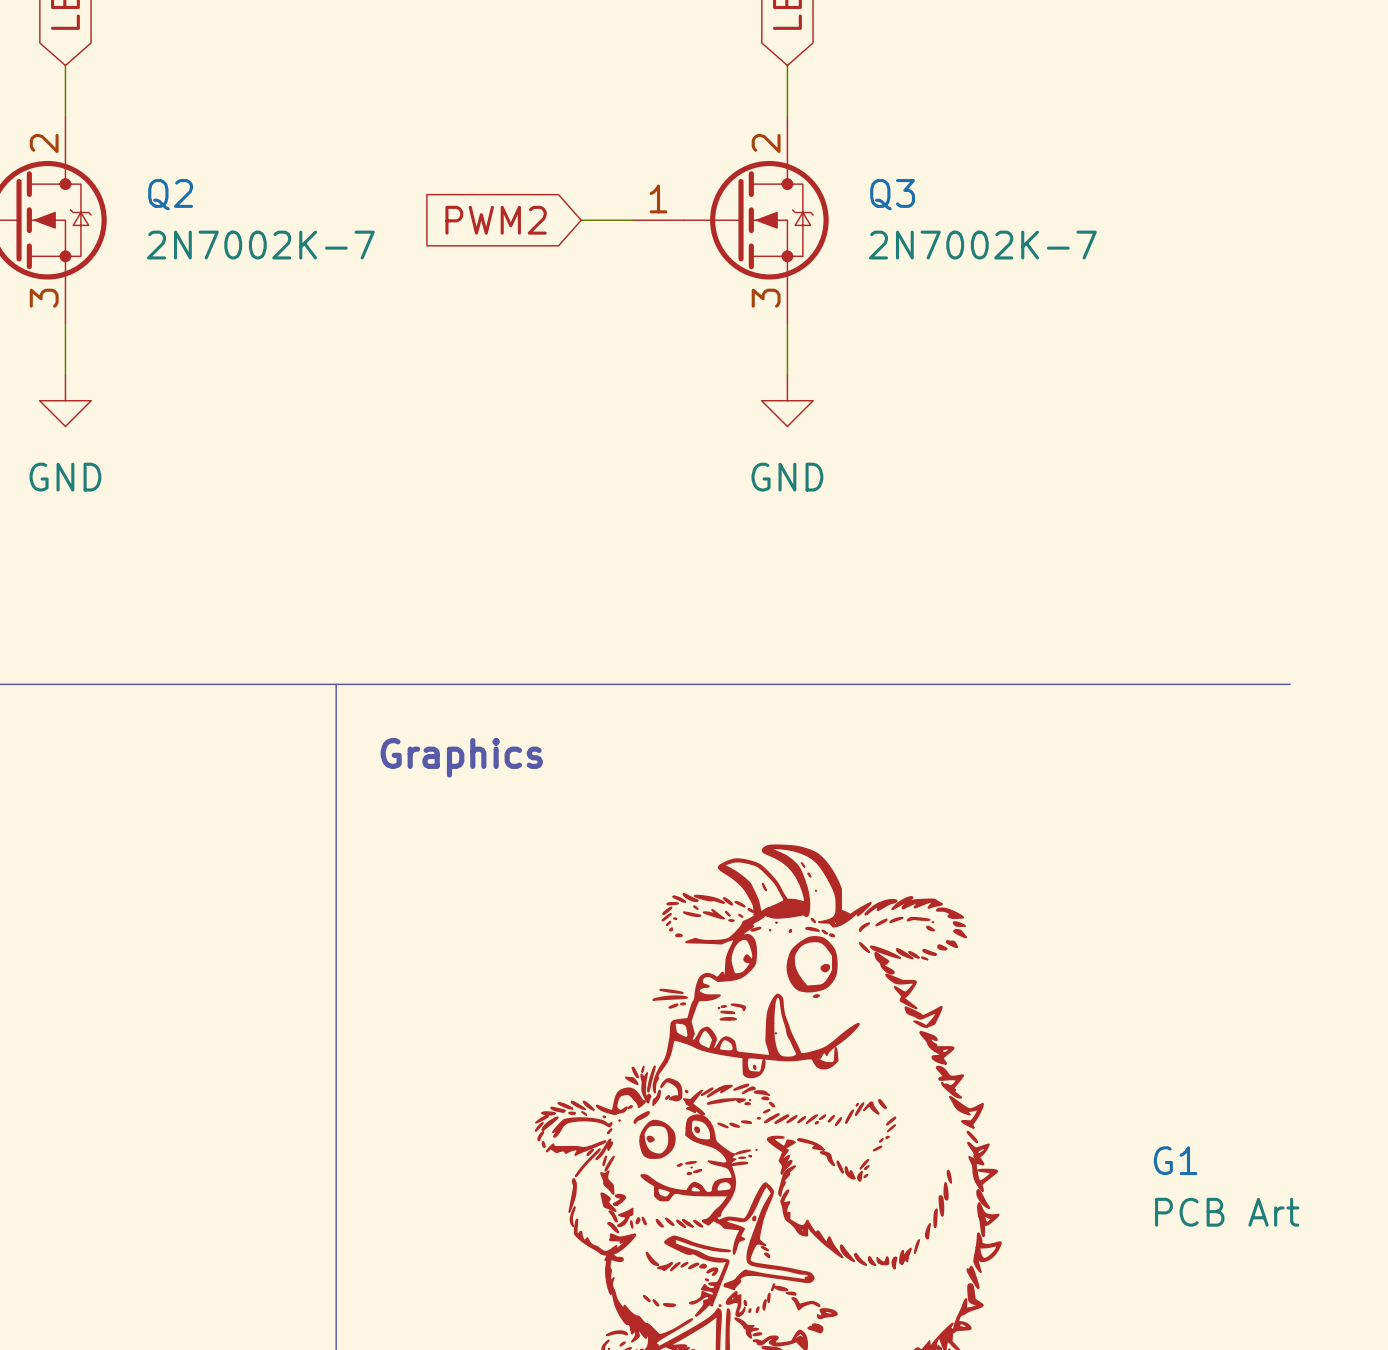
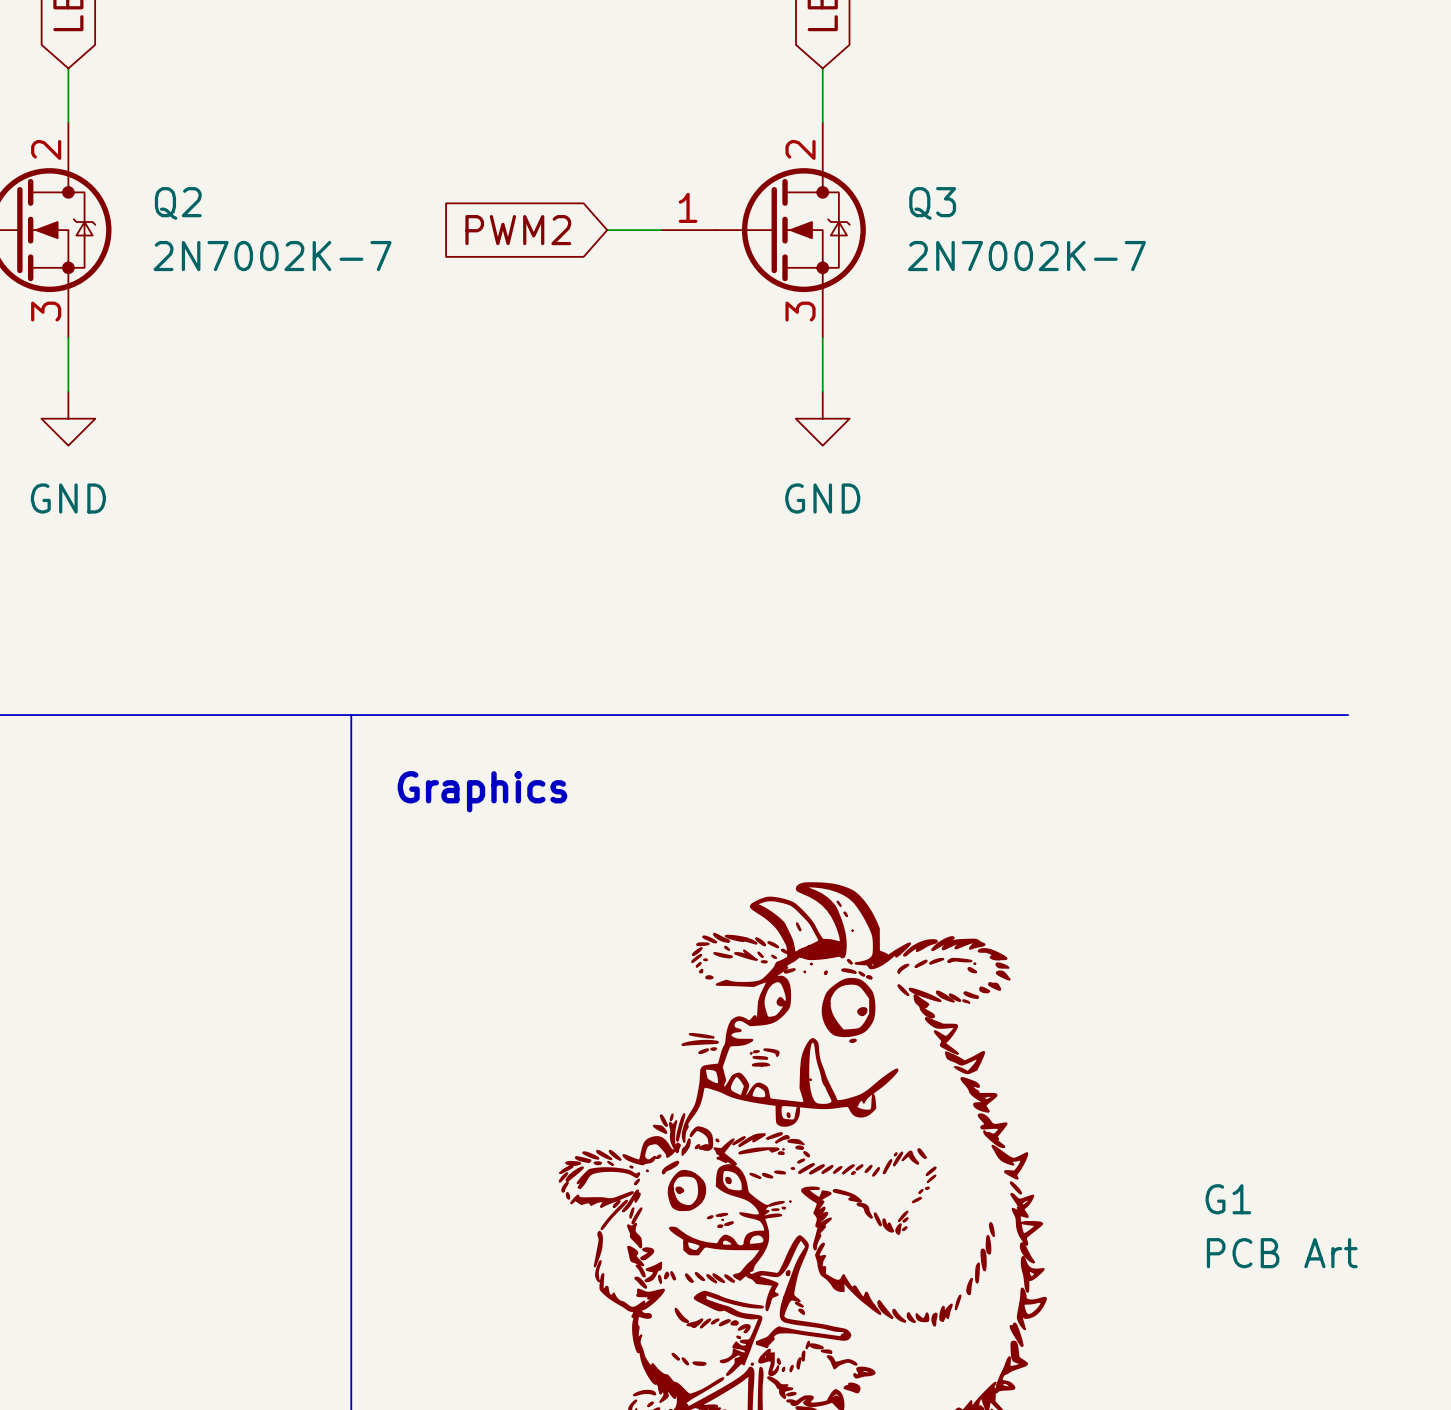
G1 name position: G1 (1175, 1160) -> G1 (1228, 1199)
G1 value position: PCB Art (1227, 1212) -> PCB Art (1282, 1253)

